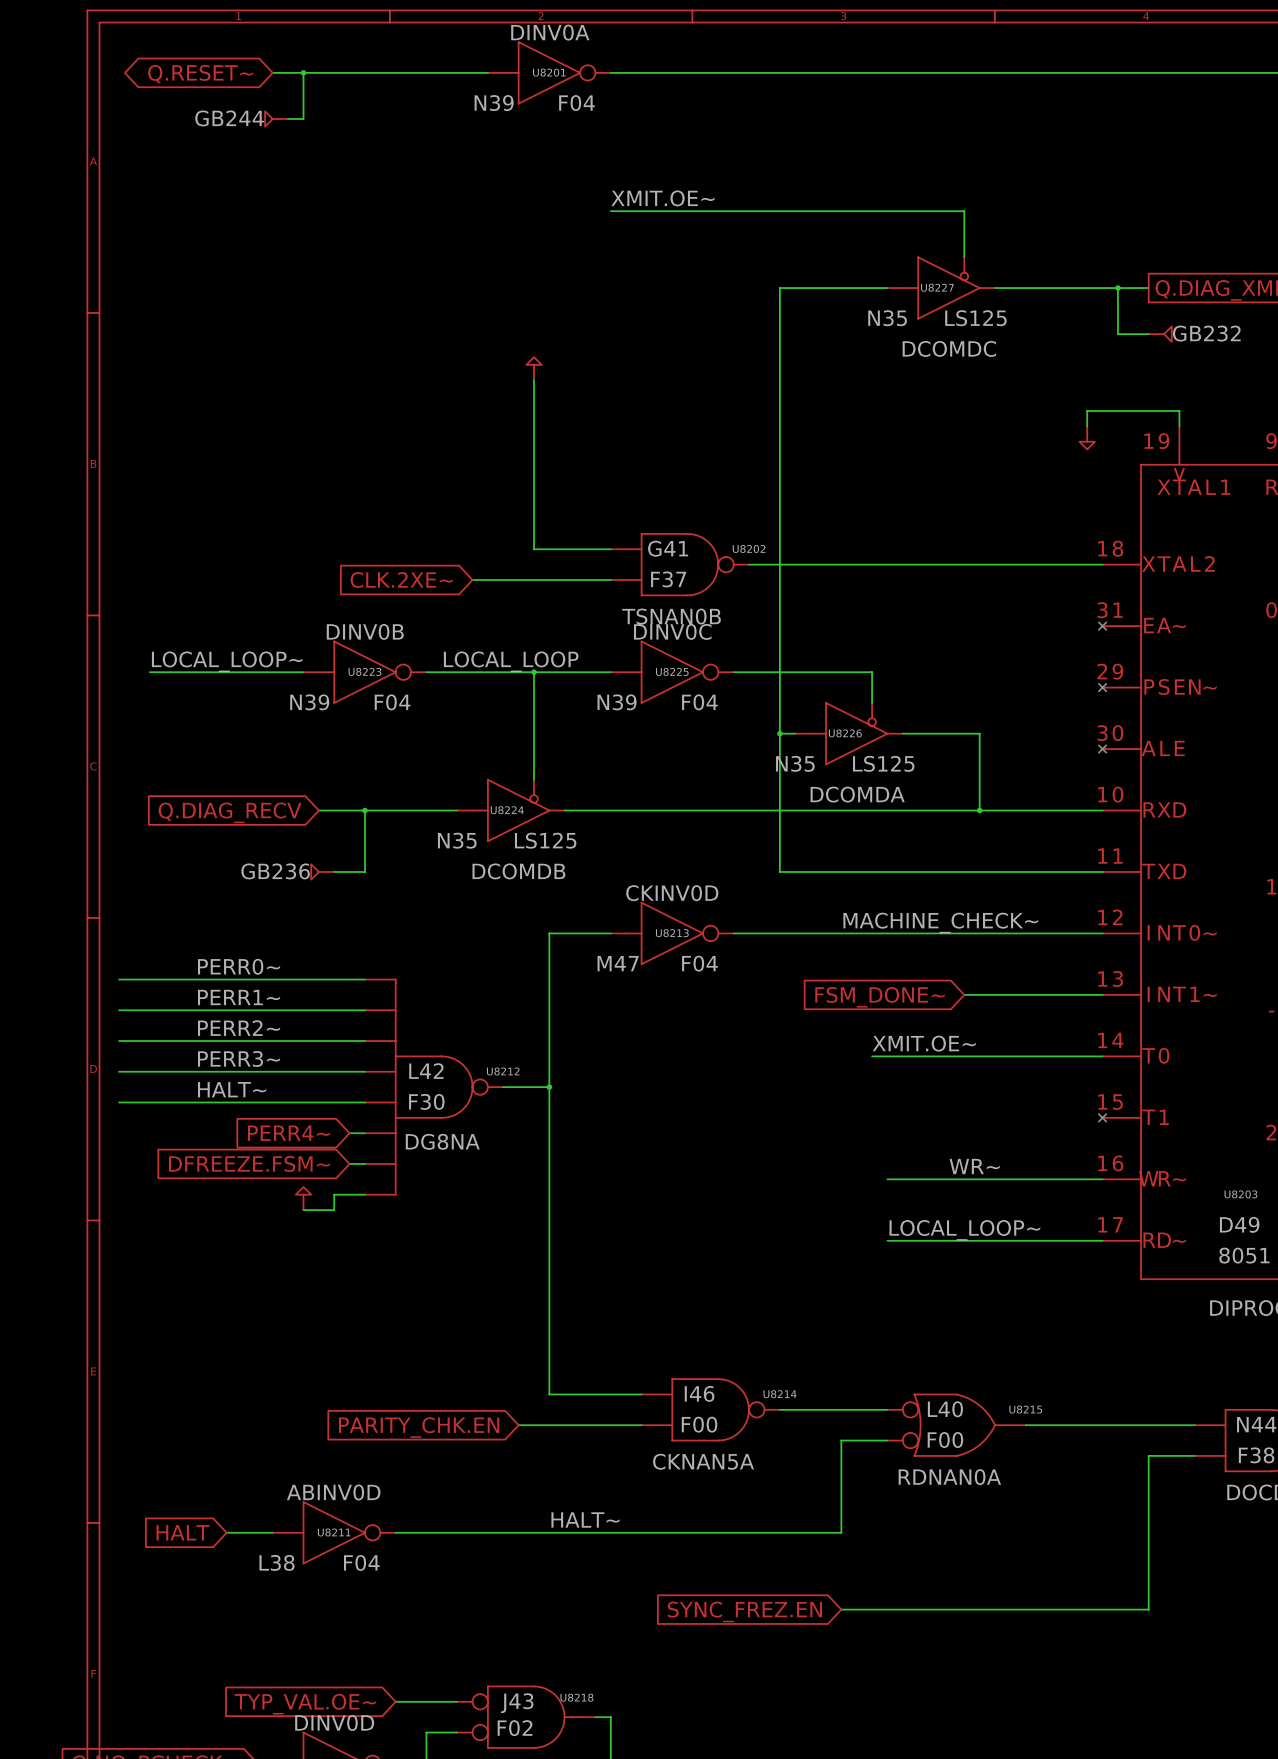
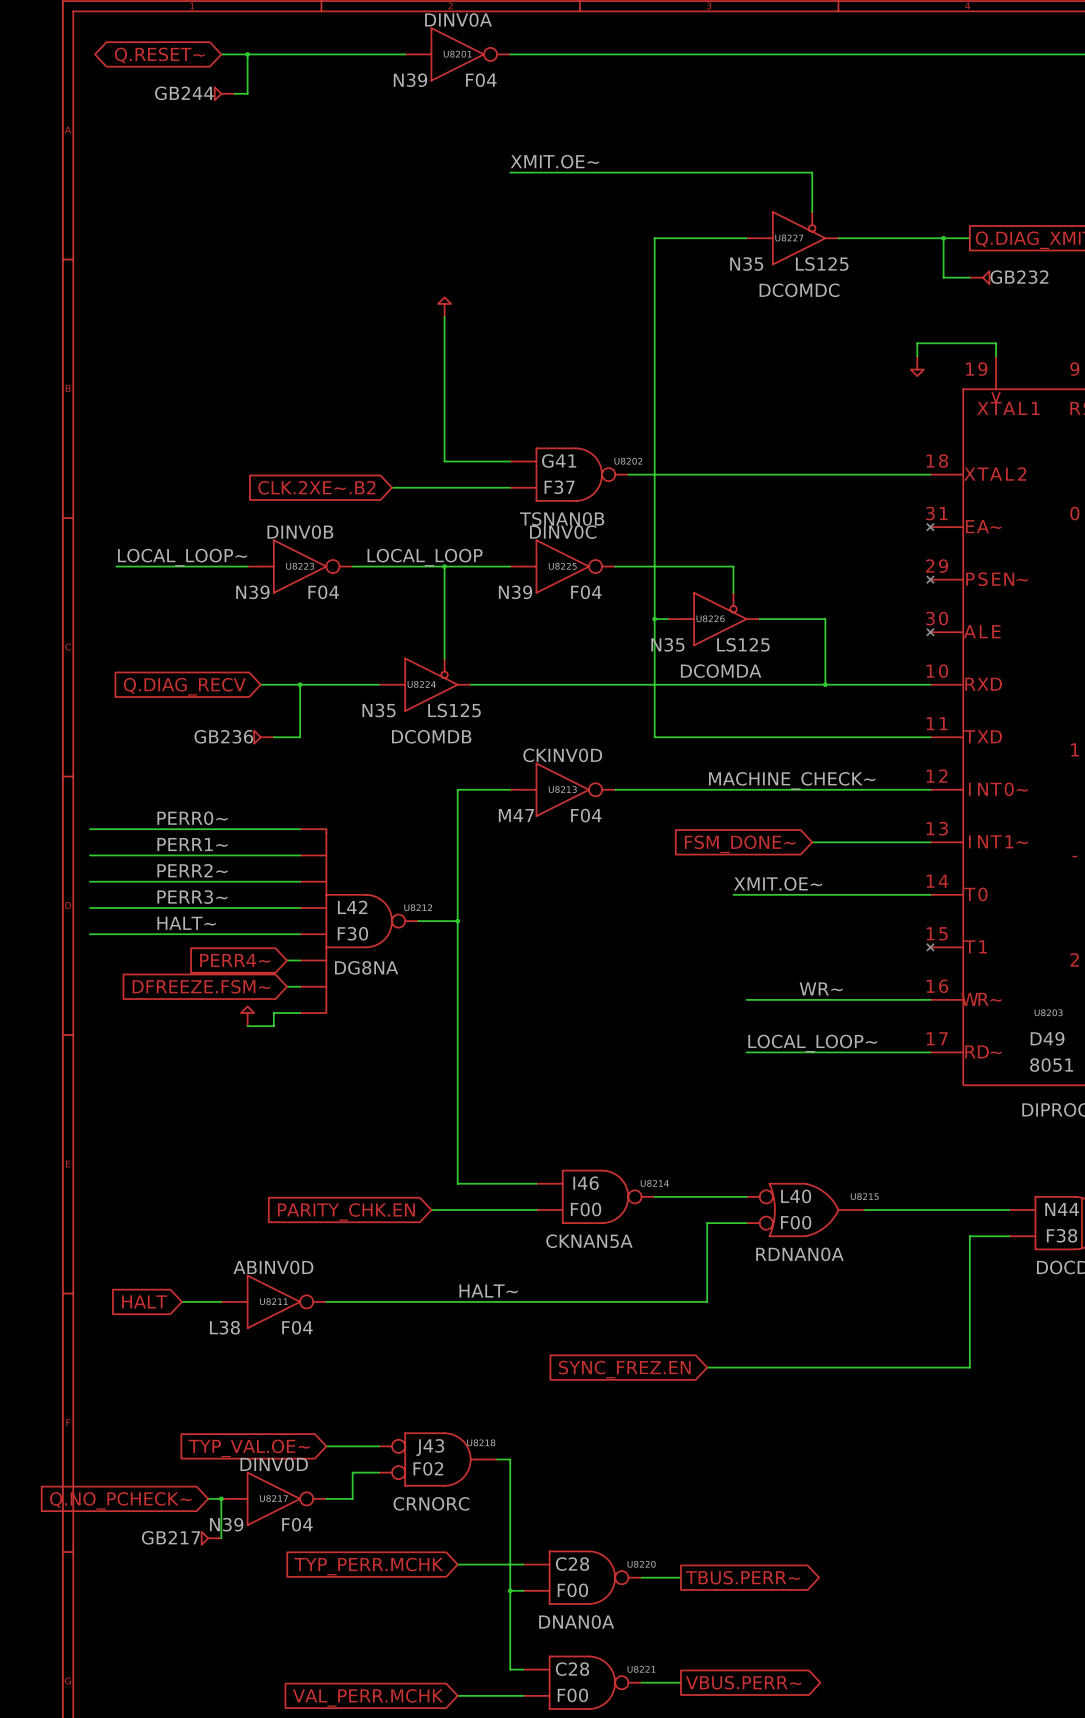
global label: CLK.2XE~ (401, 580) -> CLK.2XE~.B2 (316, 487)

